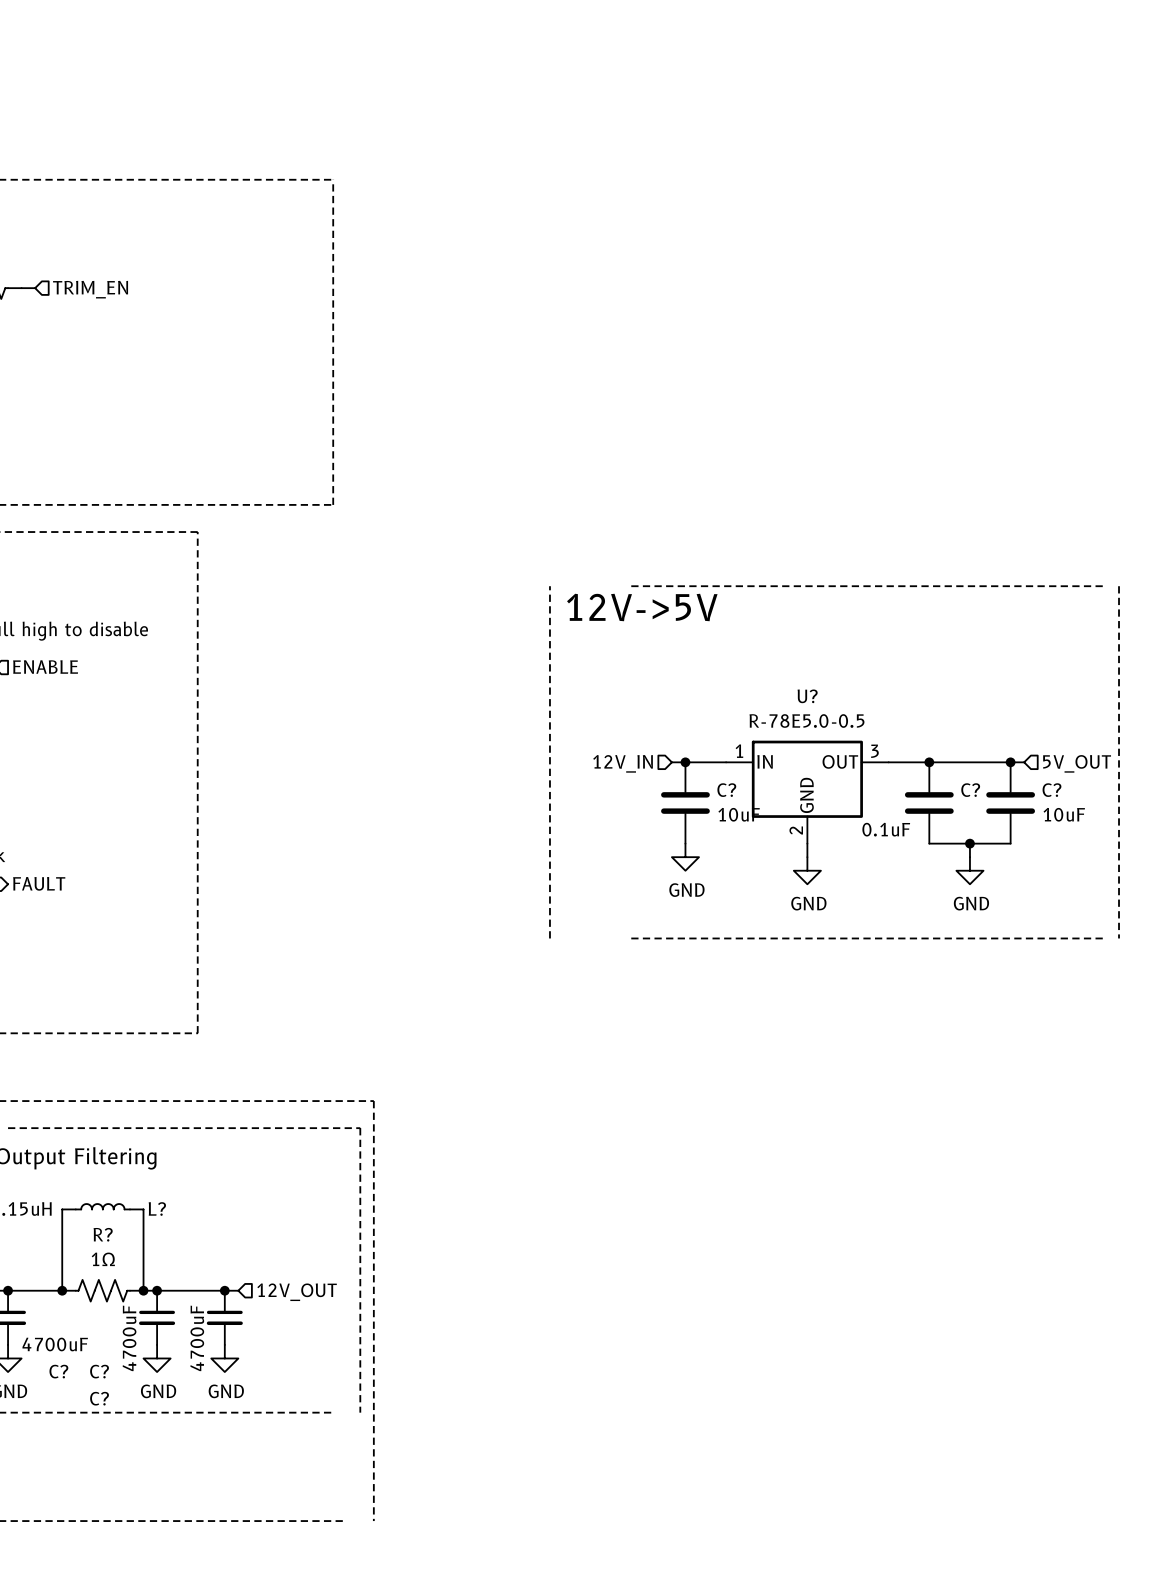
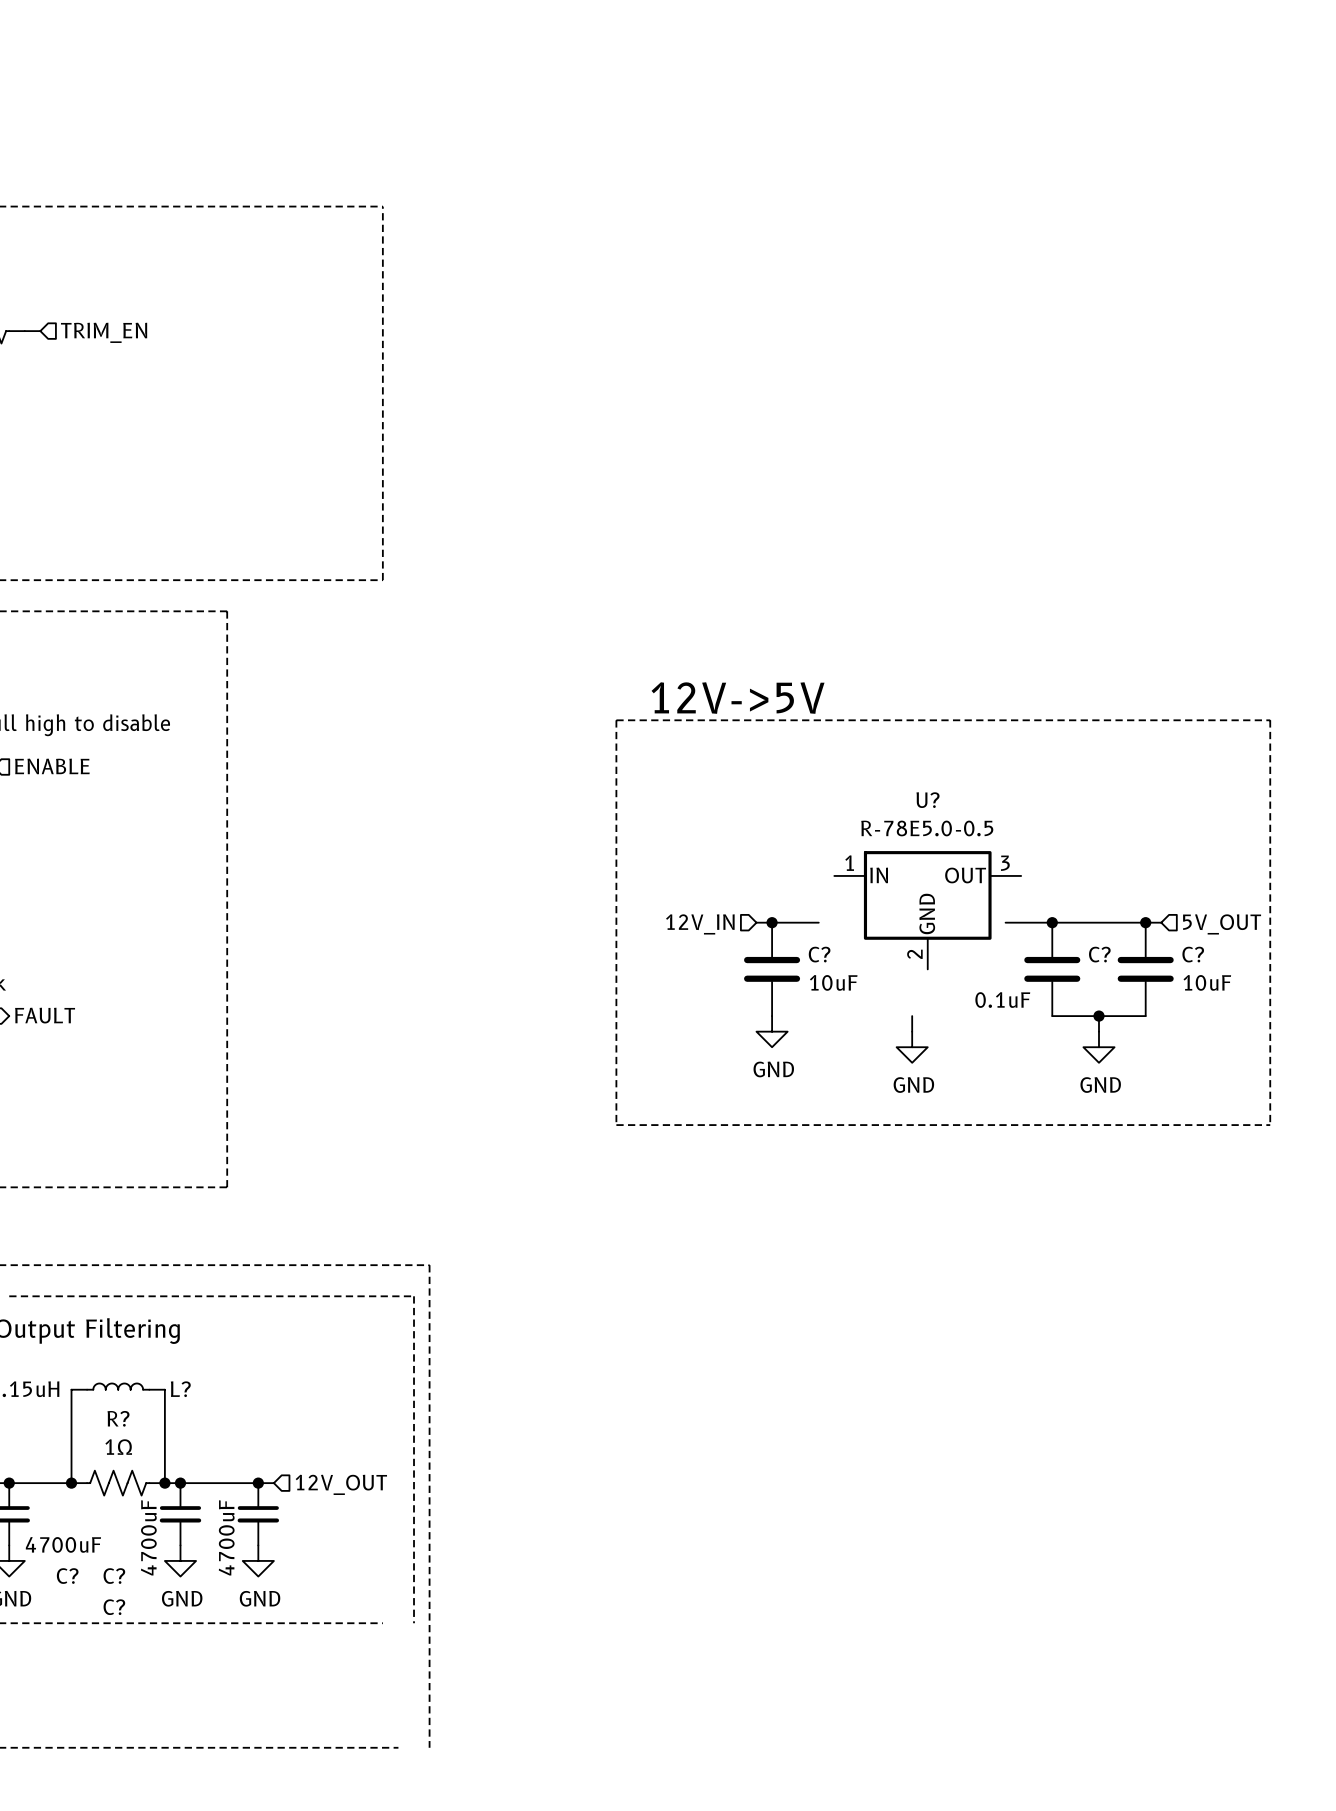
line: (549, 586) (549, 938) -> none
line: (631, 586) (1105, 586) -> none
line: (1119, 586) (1119, 938) -> none
line: none -> (616, 720) (616, 1125) (1270, 1125) (1270, 720) (616, 720)
wire: (671, 762) (726, 762) -> (756, 922) (818, 922)
junction position: (685, 762) -> (772, 922)
wire: (888, 762) (1024, 762) -> (1005, 922) (1161, 922)
junction: (929, 762) -> none
junction: (1010, 762) -> none
hierarchical label position: 12V_IN (623, 763) -> 12V_IN (700, 924)
hierarchical label position: 5V_OUT (1077, 763) -> 5V_OUT (1222, 924)
C? position: (685, 802) -> (772, 969)
junction: none -> (1052, 922)
C? position: (929, 802) -> (1052, 969)
junction: none -> (1145, 922)
C? position: (1010, 802) -> (1145, 969)
wire: (807, 843) (807, 857) -> (912, 1016) (912, 1031)
wire: (929, 843) (1010, 843) -> (1052, 1016) (1145, 1016)
wire: (969, 843) (969, 857) -> (1098, 1016) (1098, 1031)
junction: (969, 843) -> none
power symbol position: GND (685, 857) -> GND (772, 1031)
power symbol position: GND (807, 870) -> GND (912, 1047)
power symbol position: GND (969, 870) -> GND (1098, 1047)
junction: none -> (1098, 1016)
line: (631, 938) (1105, 938) -> none

